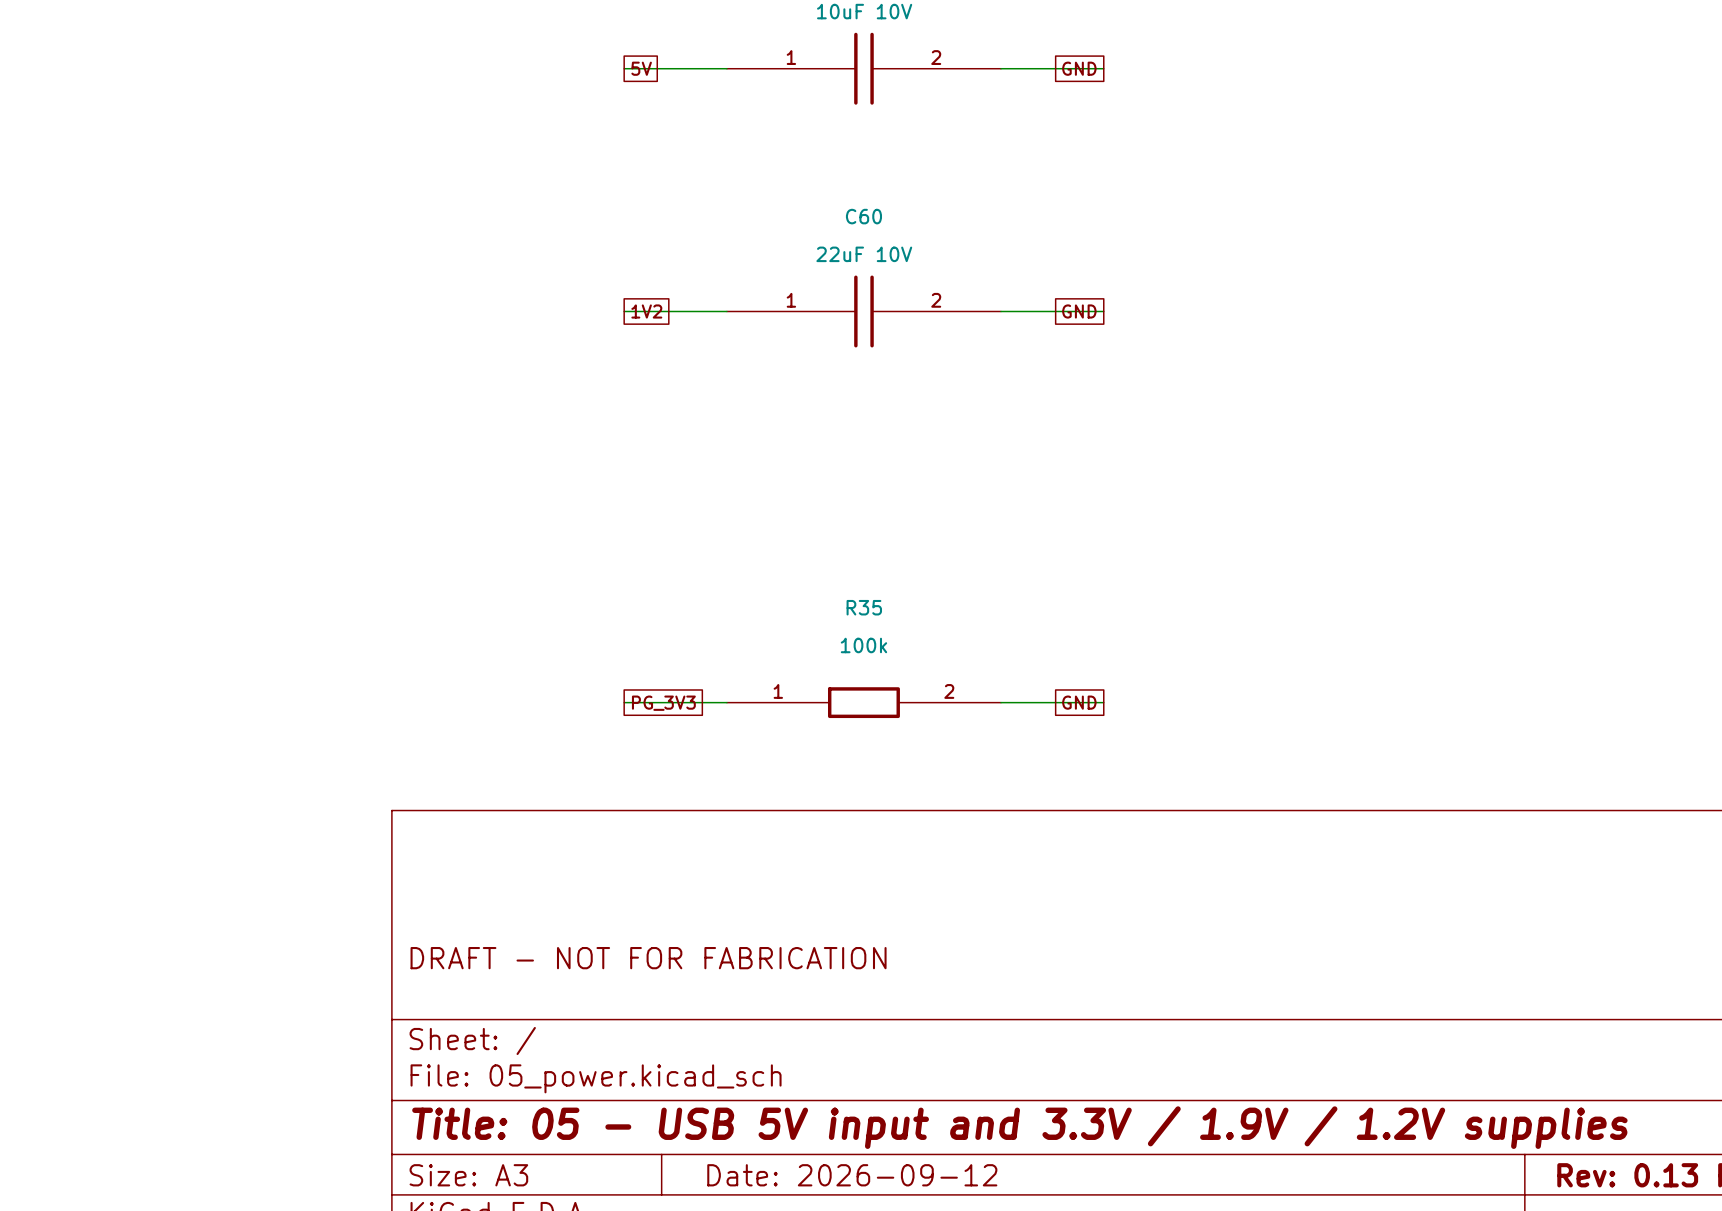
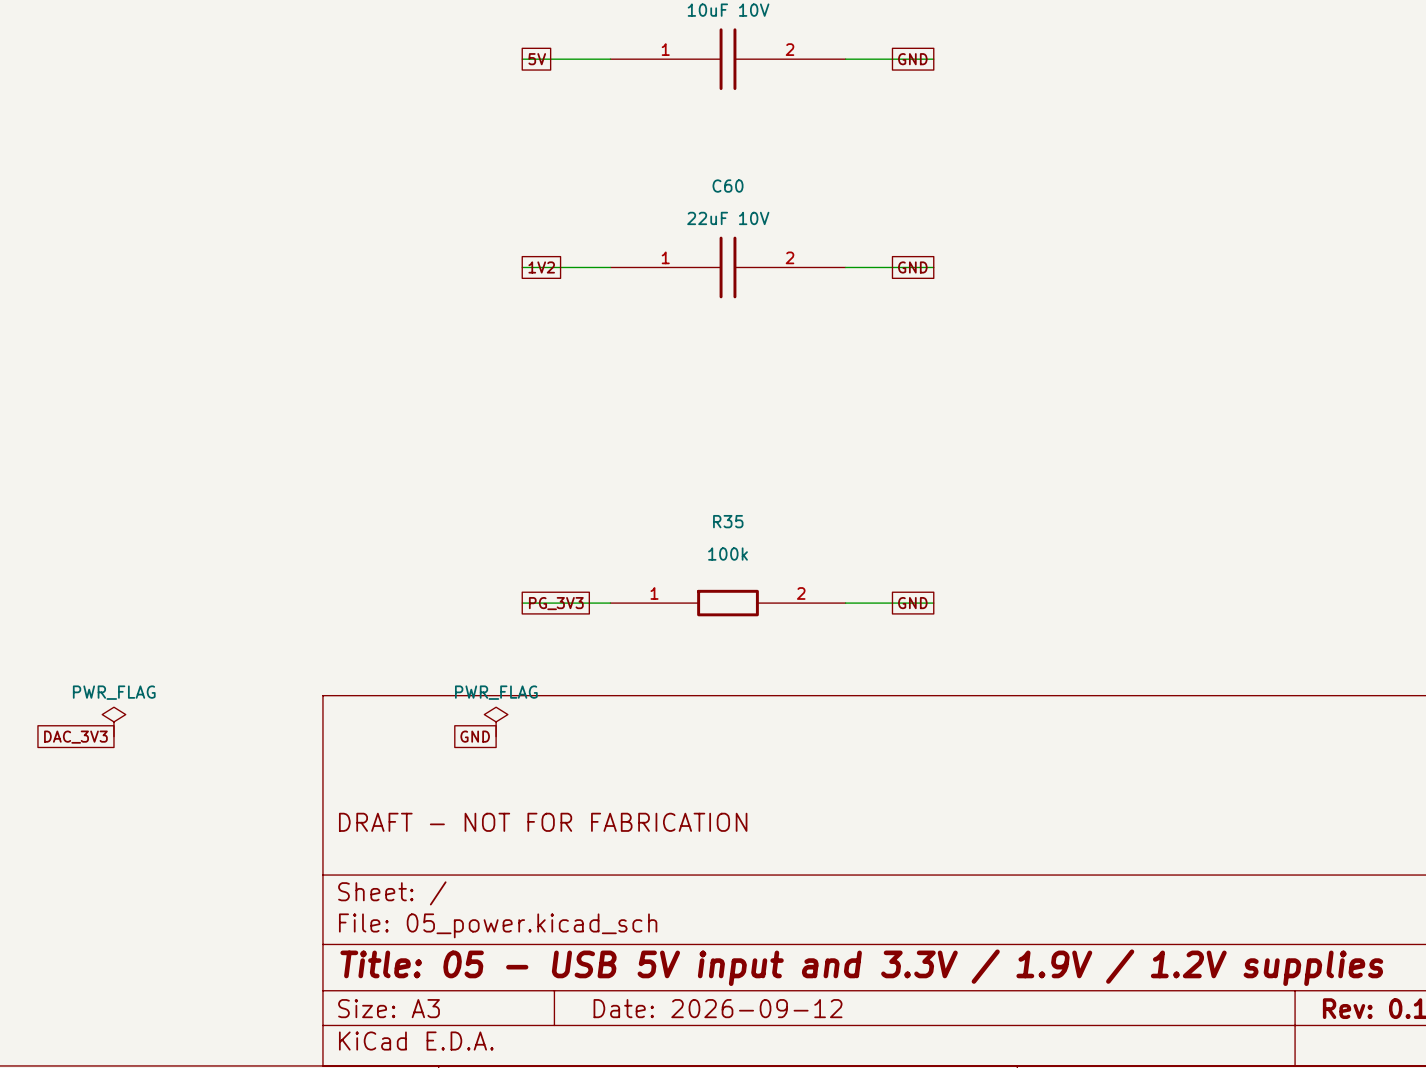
power symbol: none -> PWR_FLAG (113, 721)
power symbol: none -> PWR_FLAG (496, 721)
global label: none -> DAC_3V3 (75, 737)
global label: none -> GND (475, 736)

